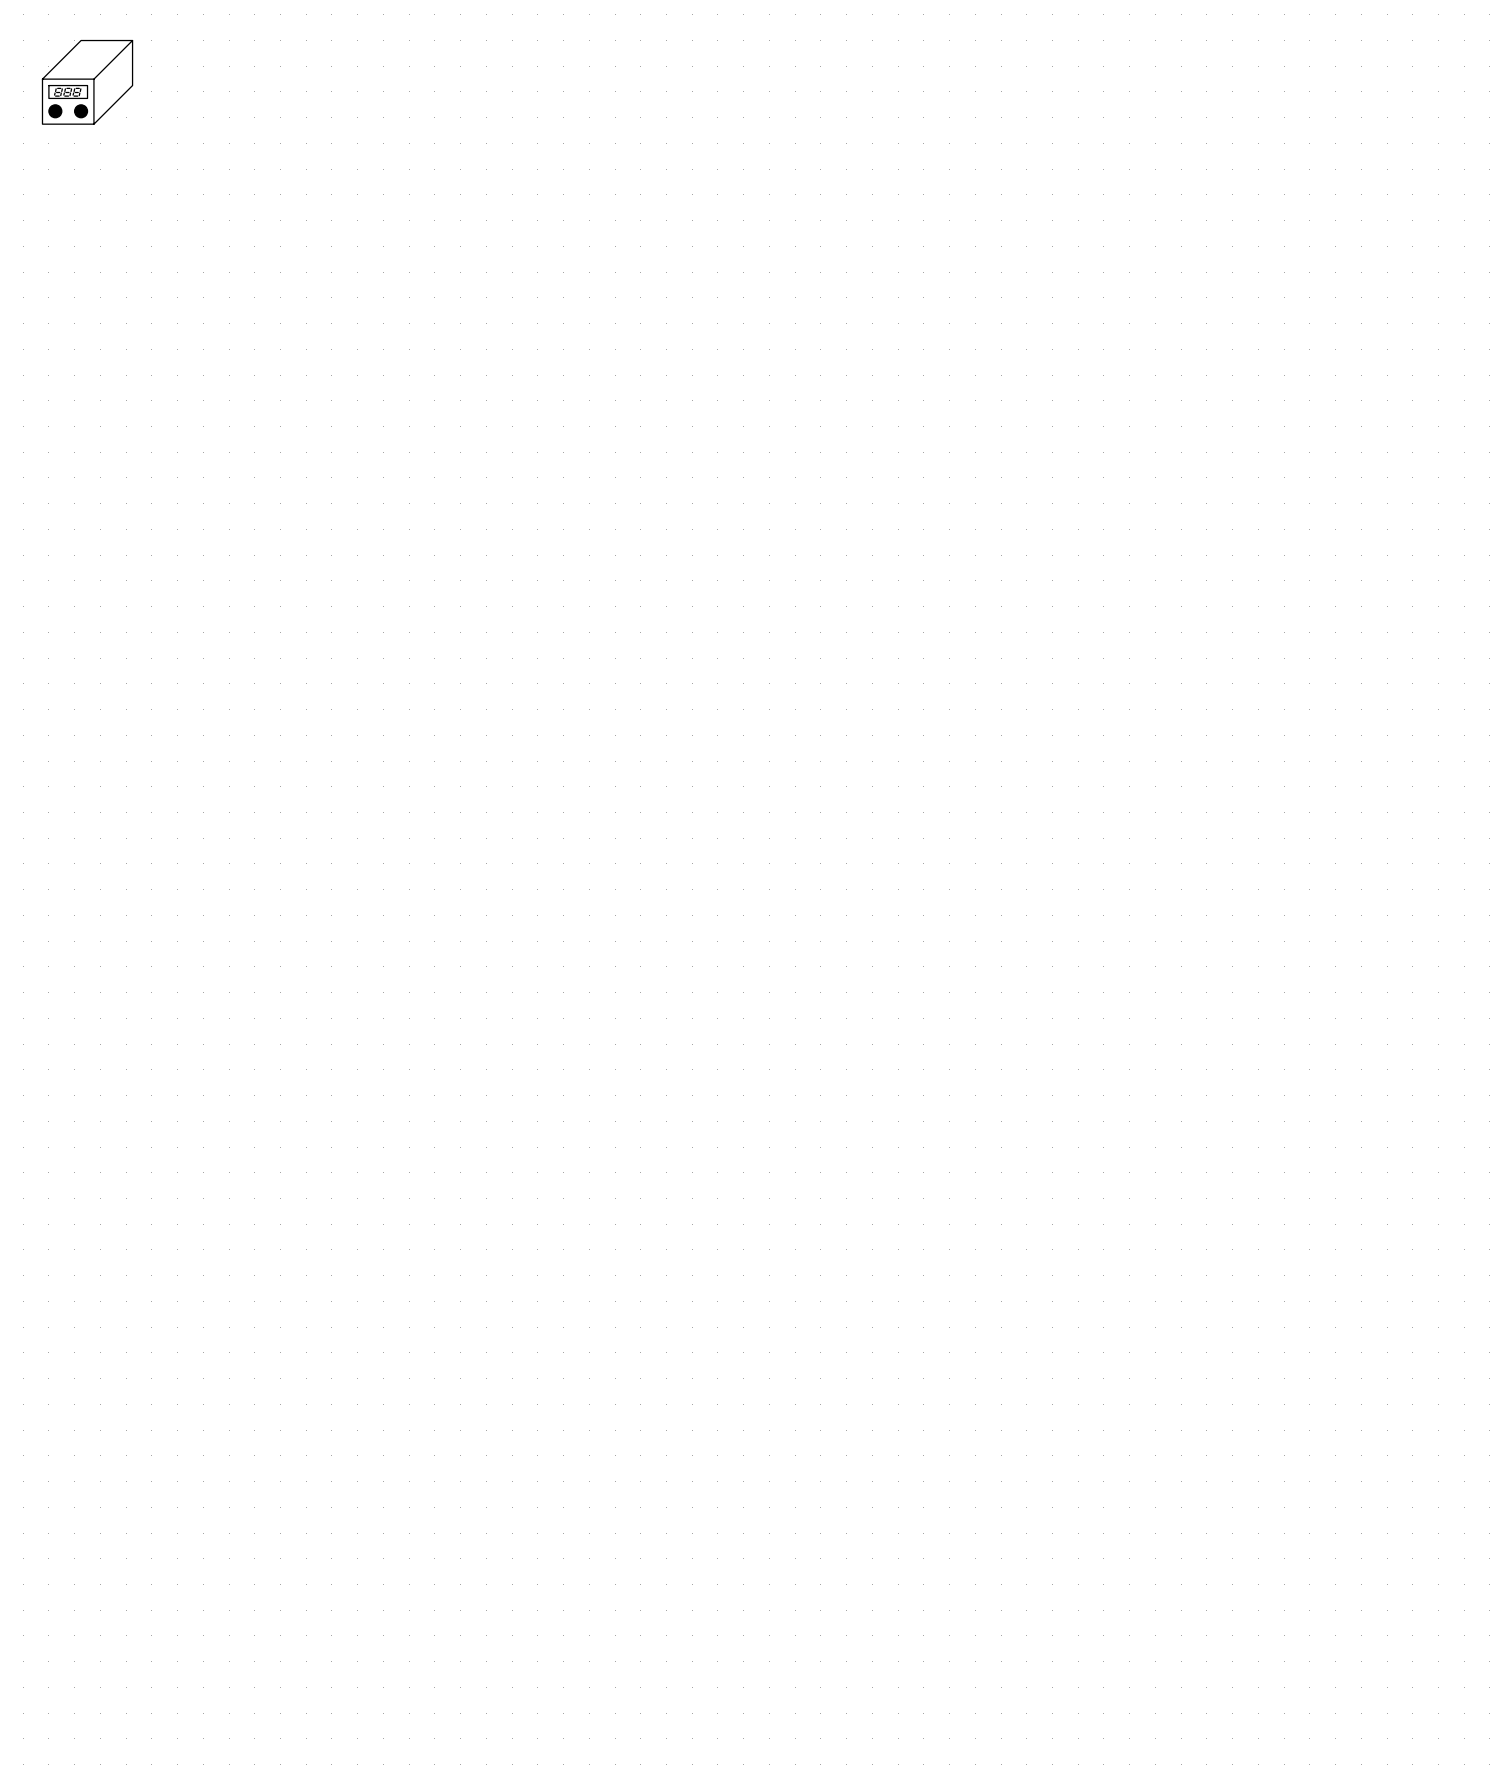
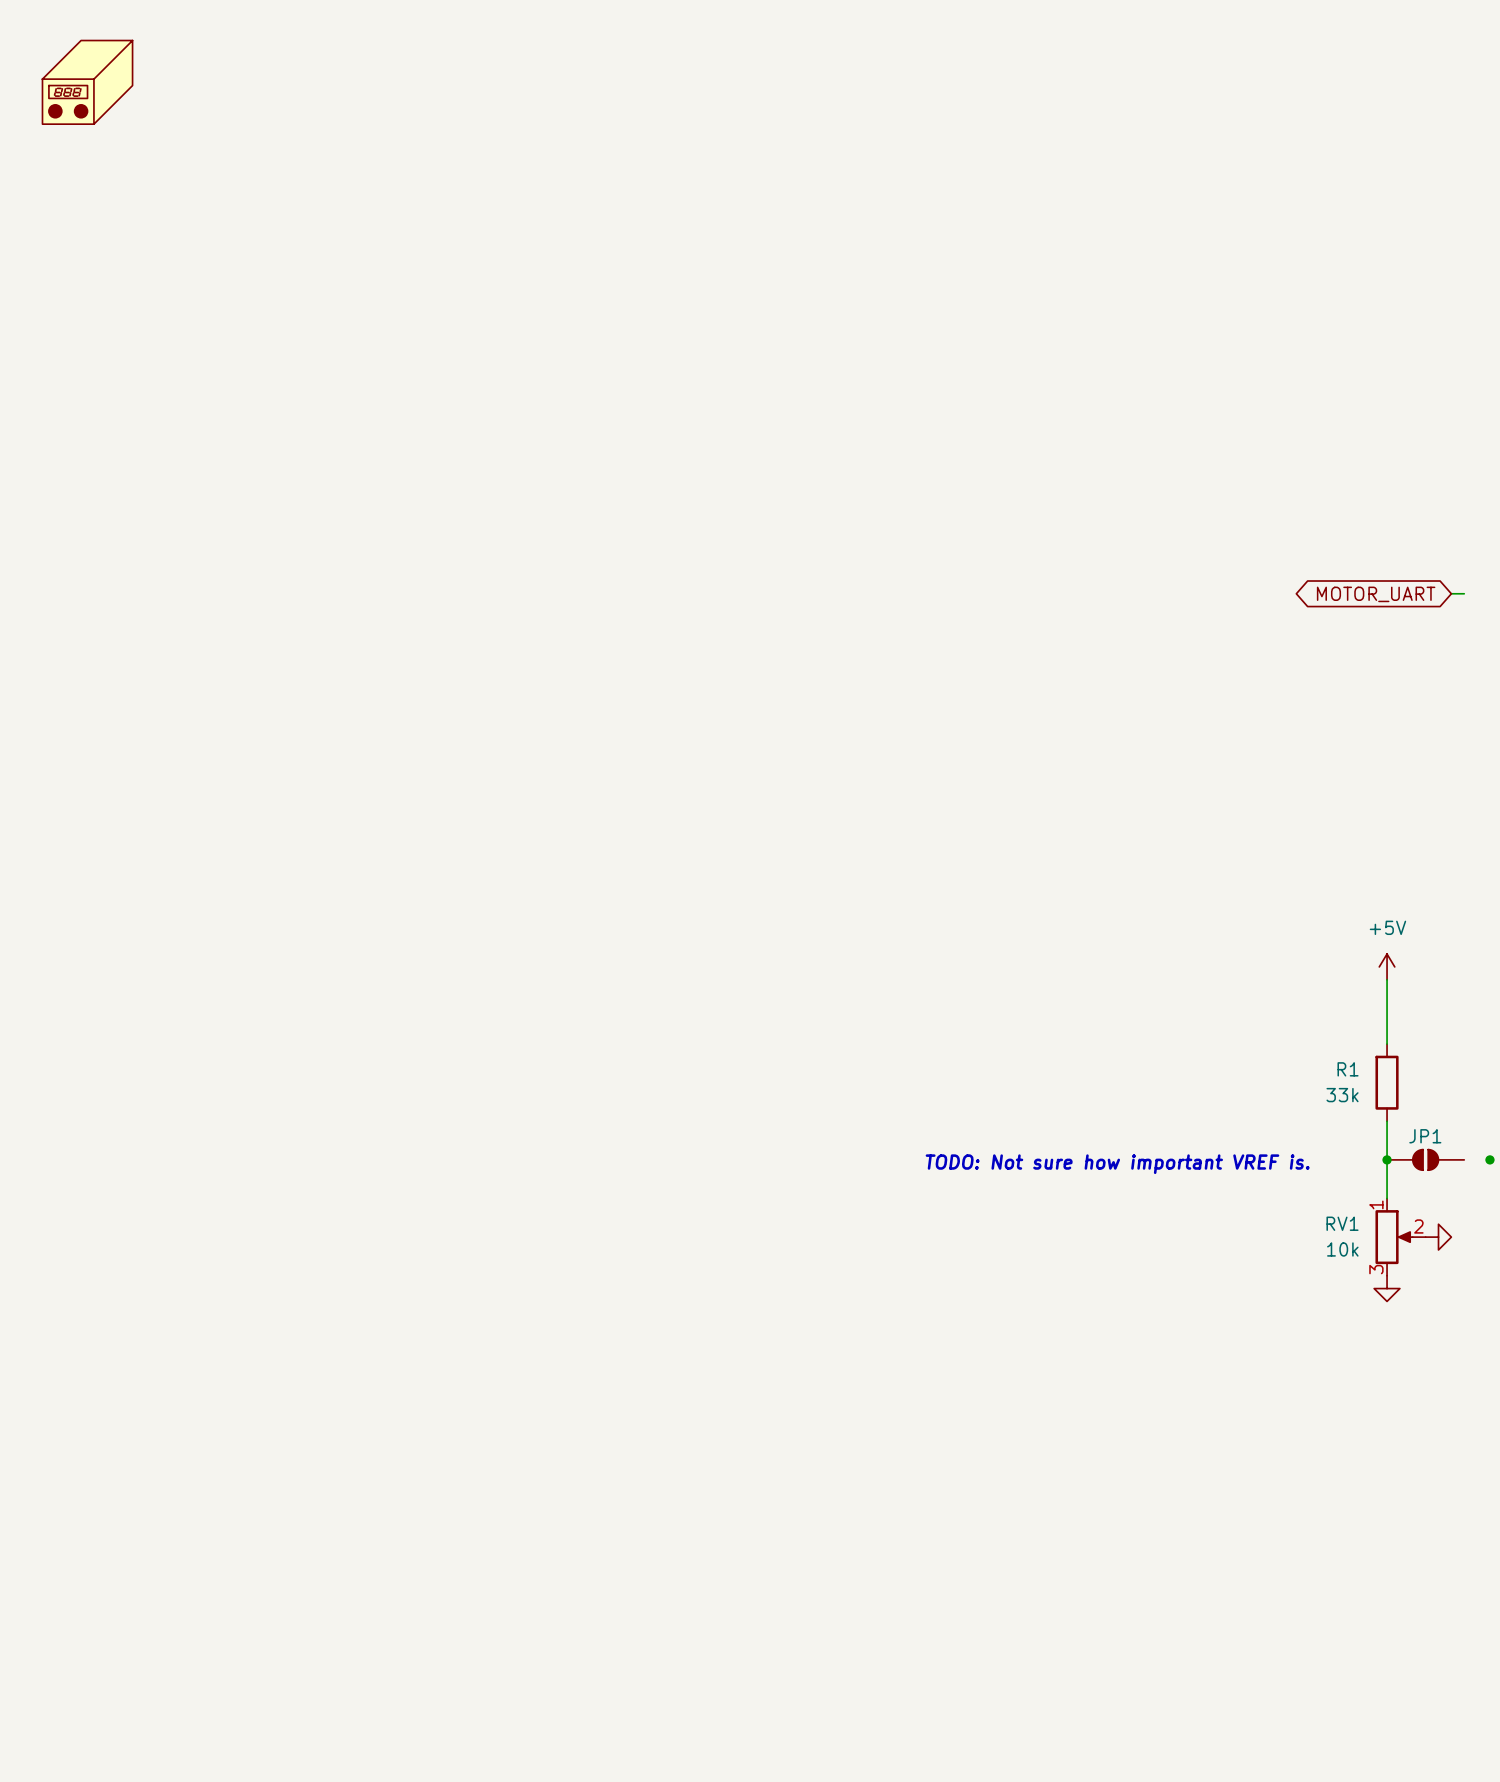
wire: none -> (1451, 593) (1464, 593)
global label: none -> MOTOR_UART (1376, 594)
power symbol: none -> +5V (1387, 966)
wire: none -> (1387, 979) (1387, 1044)
R1: none -> 33k (1387, 1082)
wire: none -> (1387, 1121) (1387, 1198)
junction: none -> (1387, 1159)
JP1: none -> (1425, 1159)
junction: none -> (1489, 1159)
text: none -> TODO: Not sure how important VREF is. (1117, 1164)
RV1: none -> 10k (1400, 1237)
power symbol: none -> (1438, 1237)
power symbol: none -> (1387, 1288)

